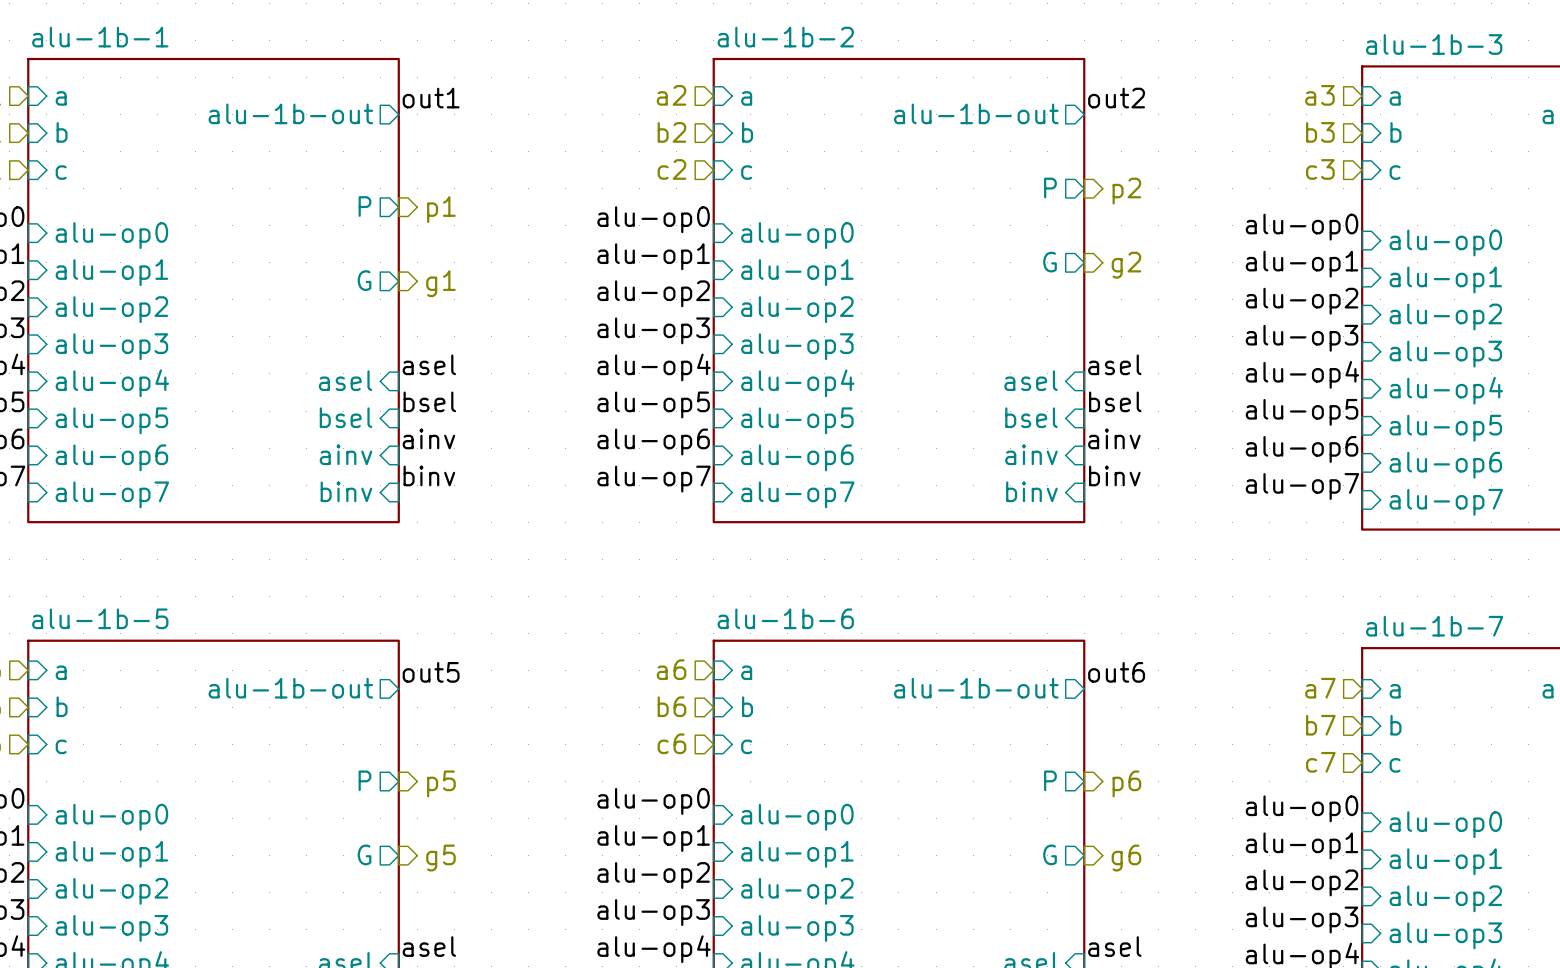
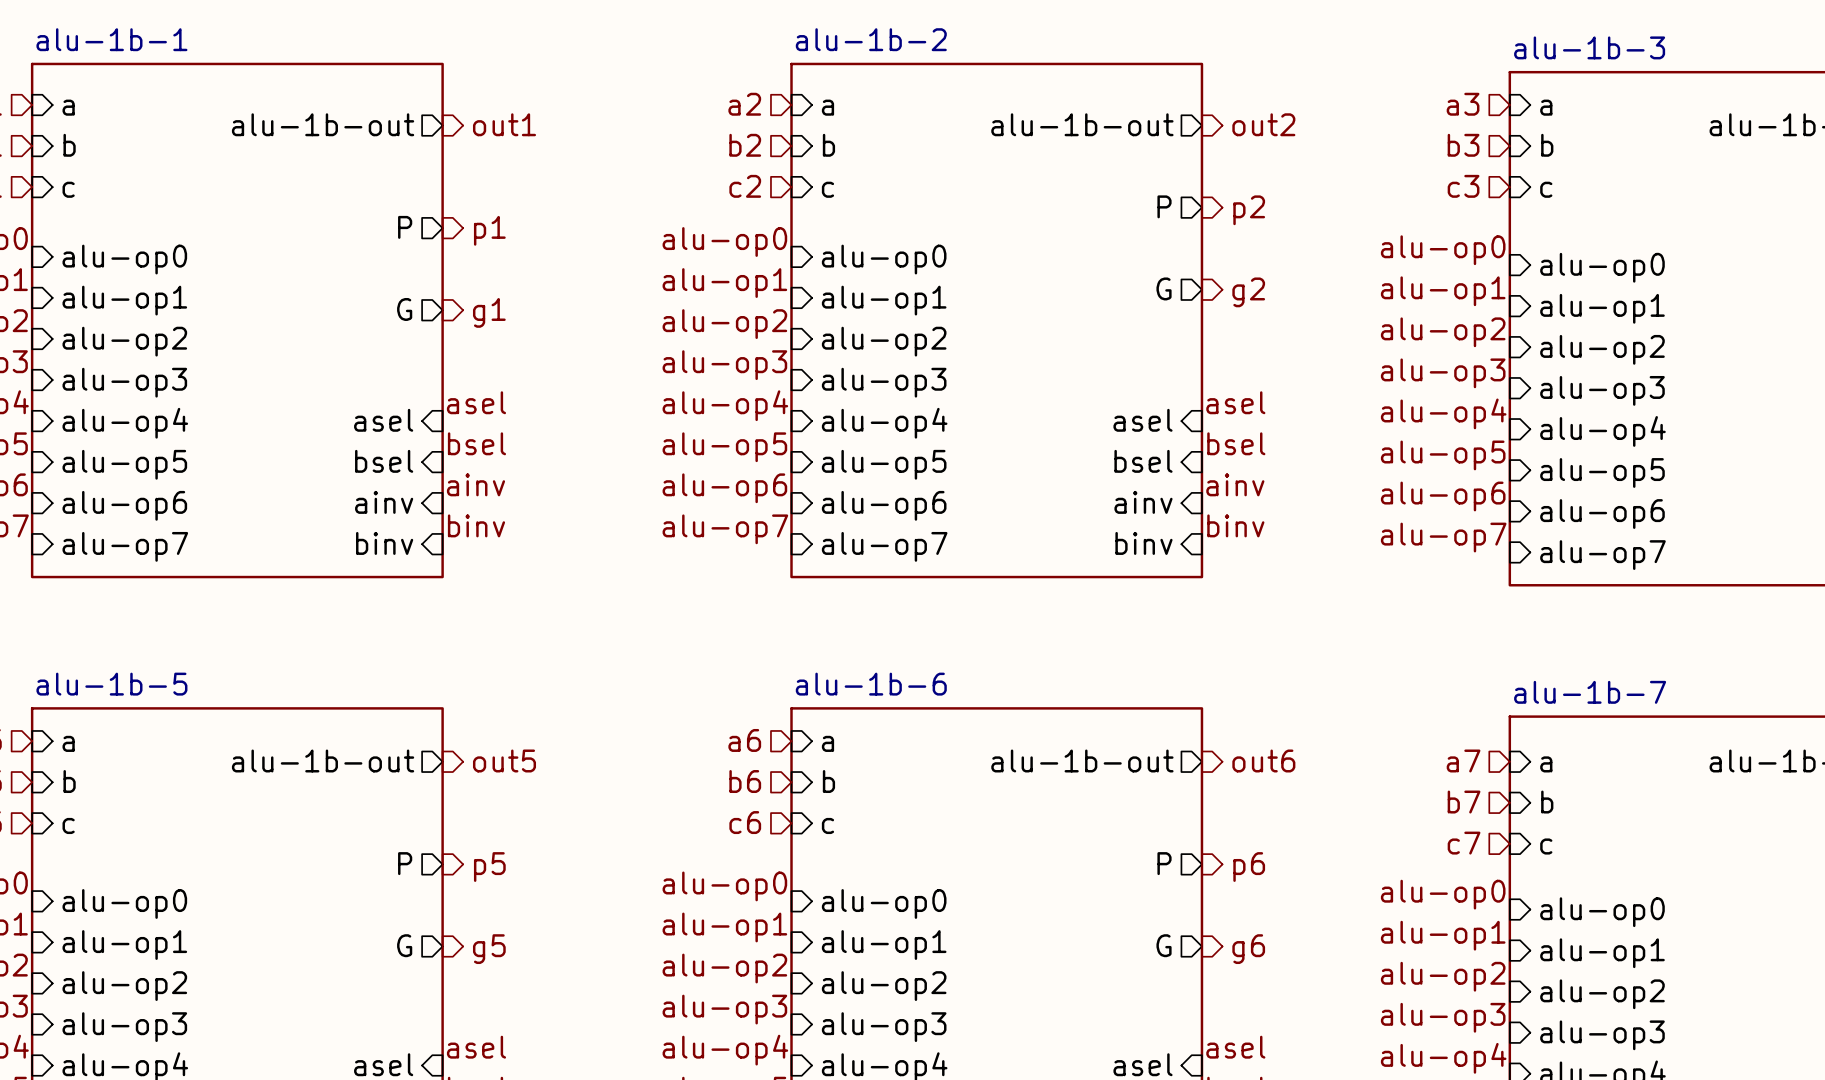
label: out1 (431, 98) -> none
label: out2 (1116, 98) -> none
hierarchical label: none -> out1 (504, 124)
hierarchical label: none -> out2 (1263, 124)
label: out5 (431, 672) -> none
label: out6 (1116, 672) -> none
hierarchical label: none -> out5 (504, 760)
hierarchical label: none -> out6 (1263, 760)

